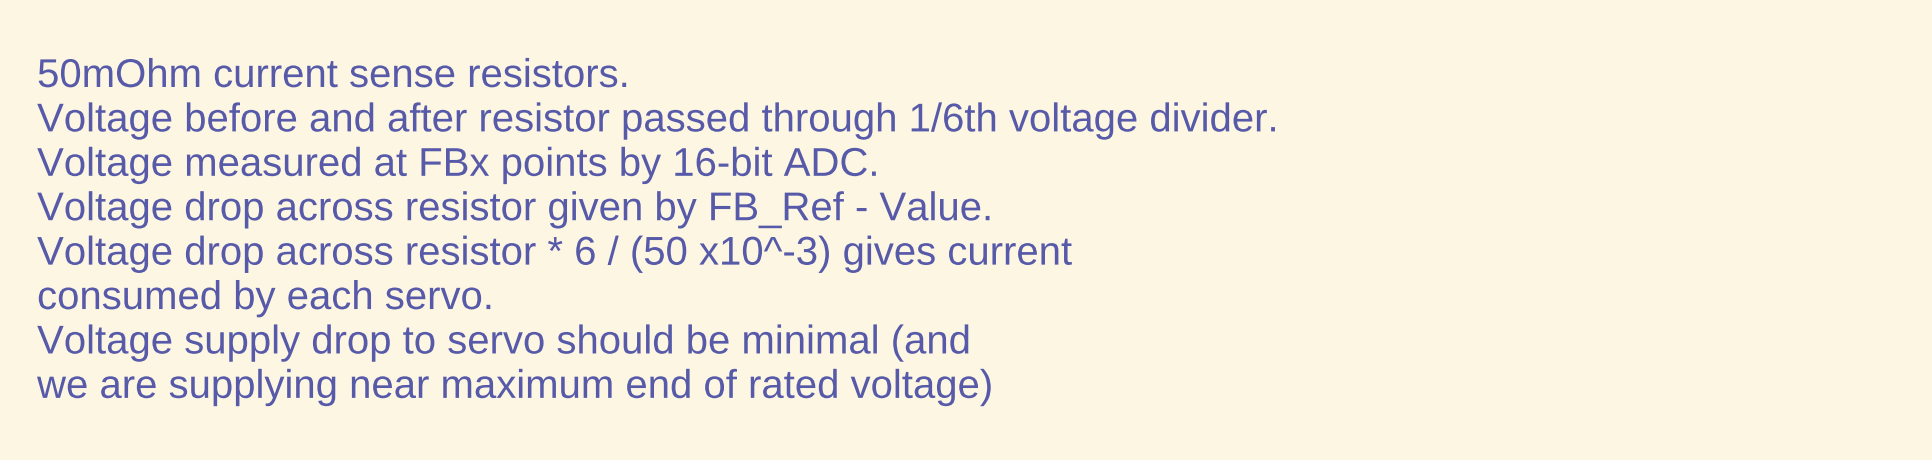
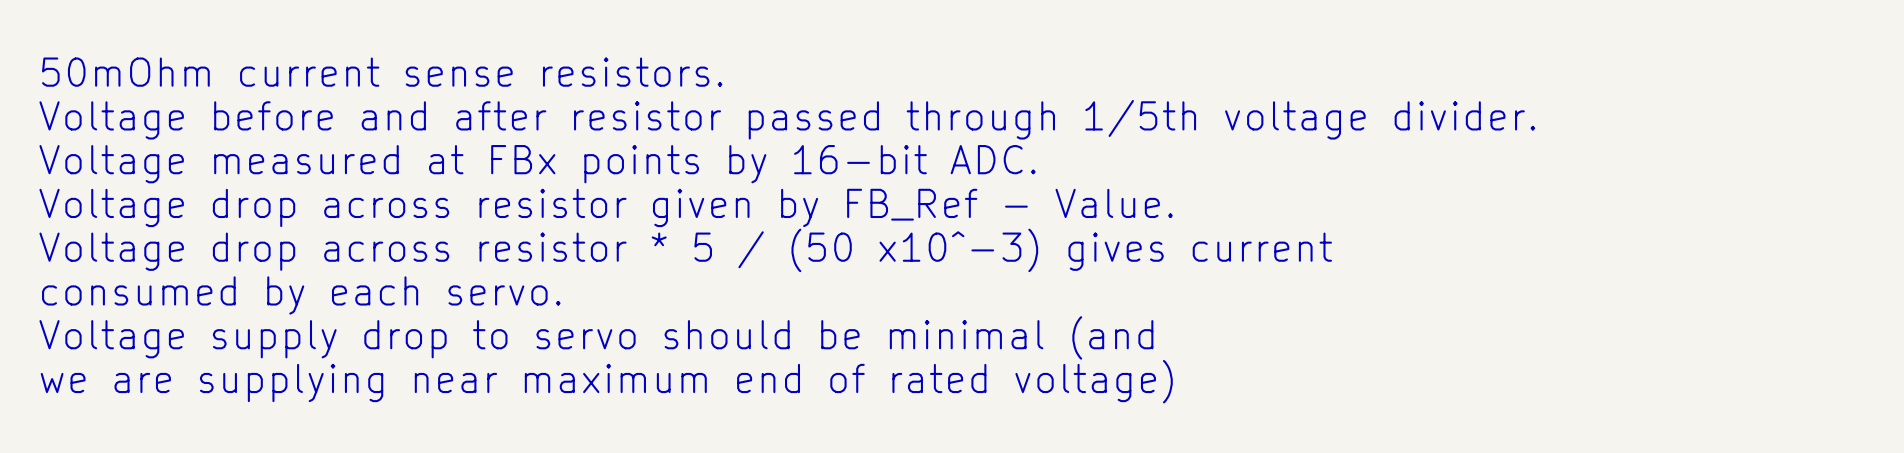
text: Voltage before and after resistor passed through 1/6th voltage divider. (656, 121) -> Voltage before and after resistor passed through 1/5th voltage divider. (787, 119)
text: Voltage drop across resistor * 6 / (50 x10^-3) gives current (554, 254) -> Voltage drop across resistor * 5 / (50 x10^-3) gives current (685, 250)

